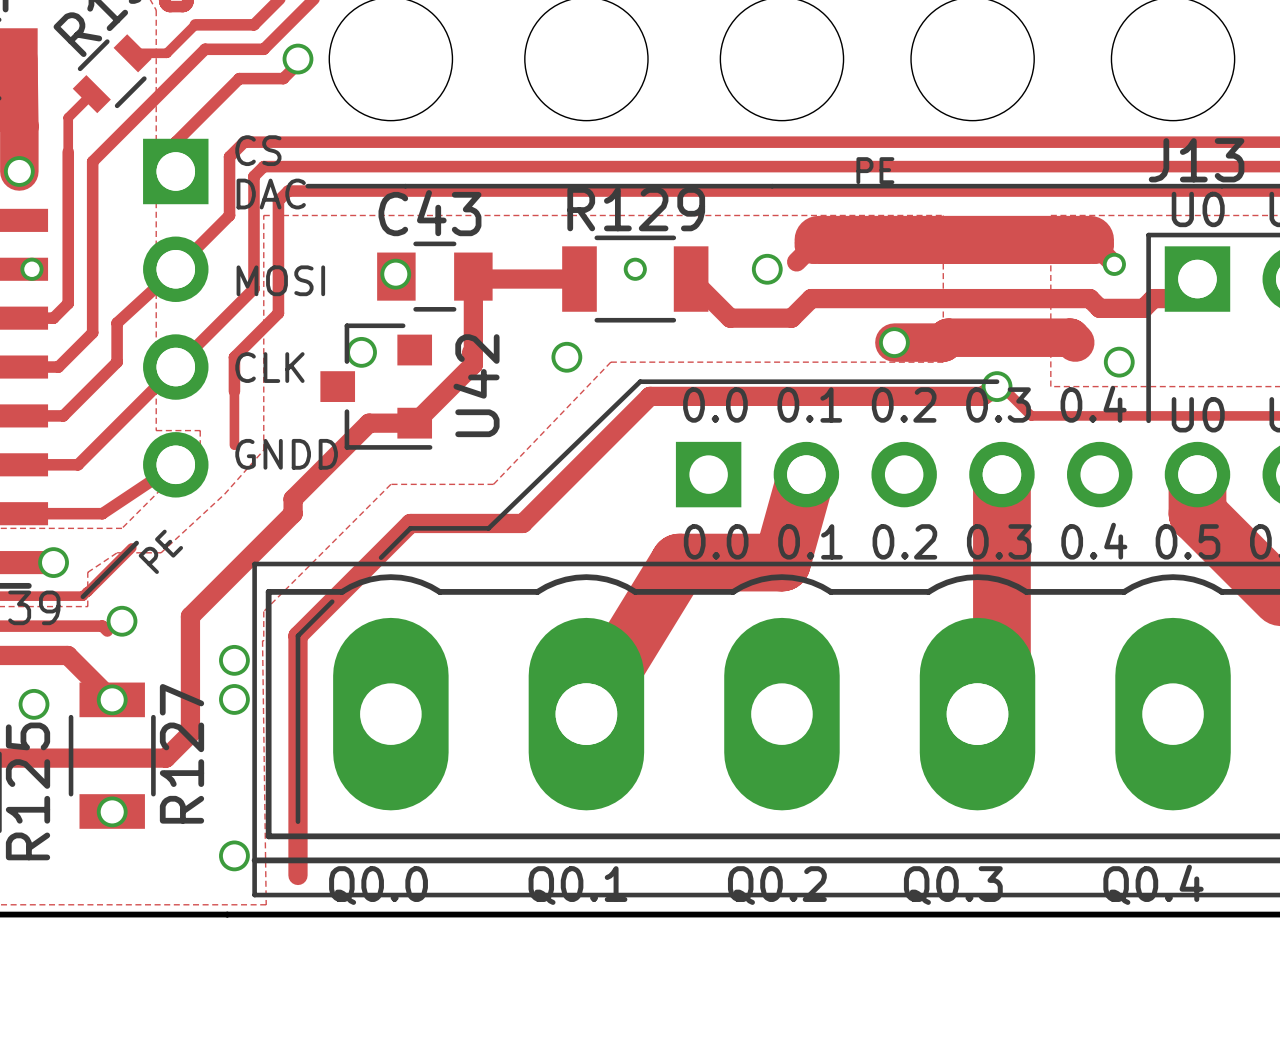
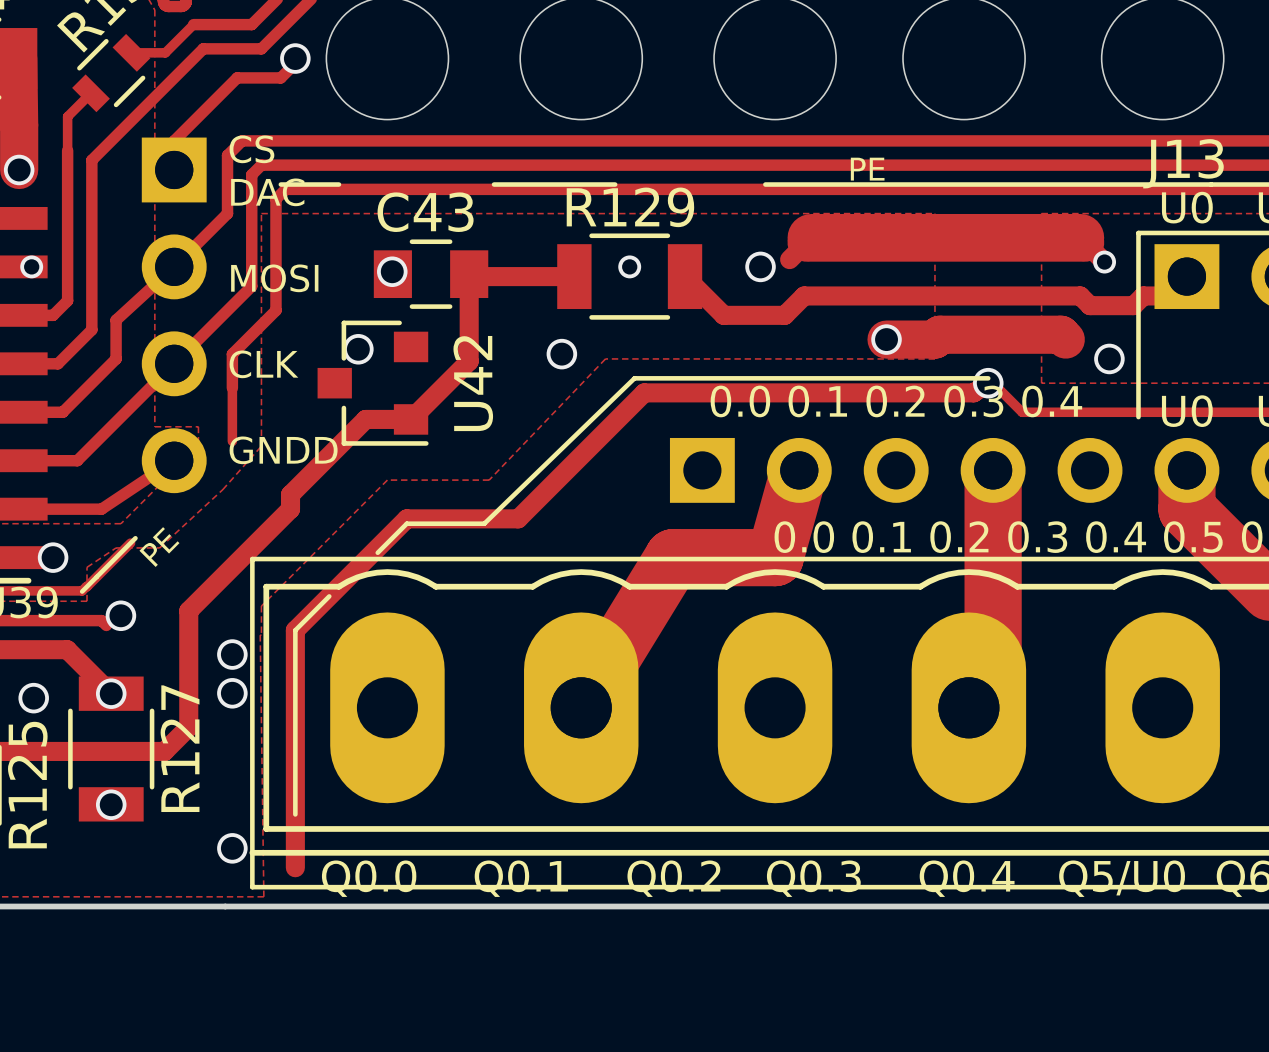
line: none -> (280, 184) (305, 184)
line: (341, 186) (498, 186) -> none
line: (620, 186) (772, 186) -> none

